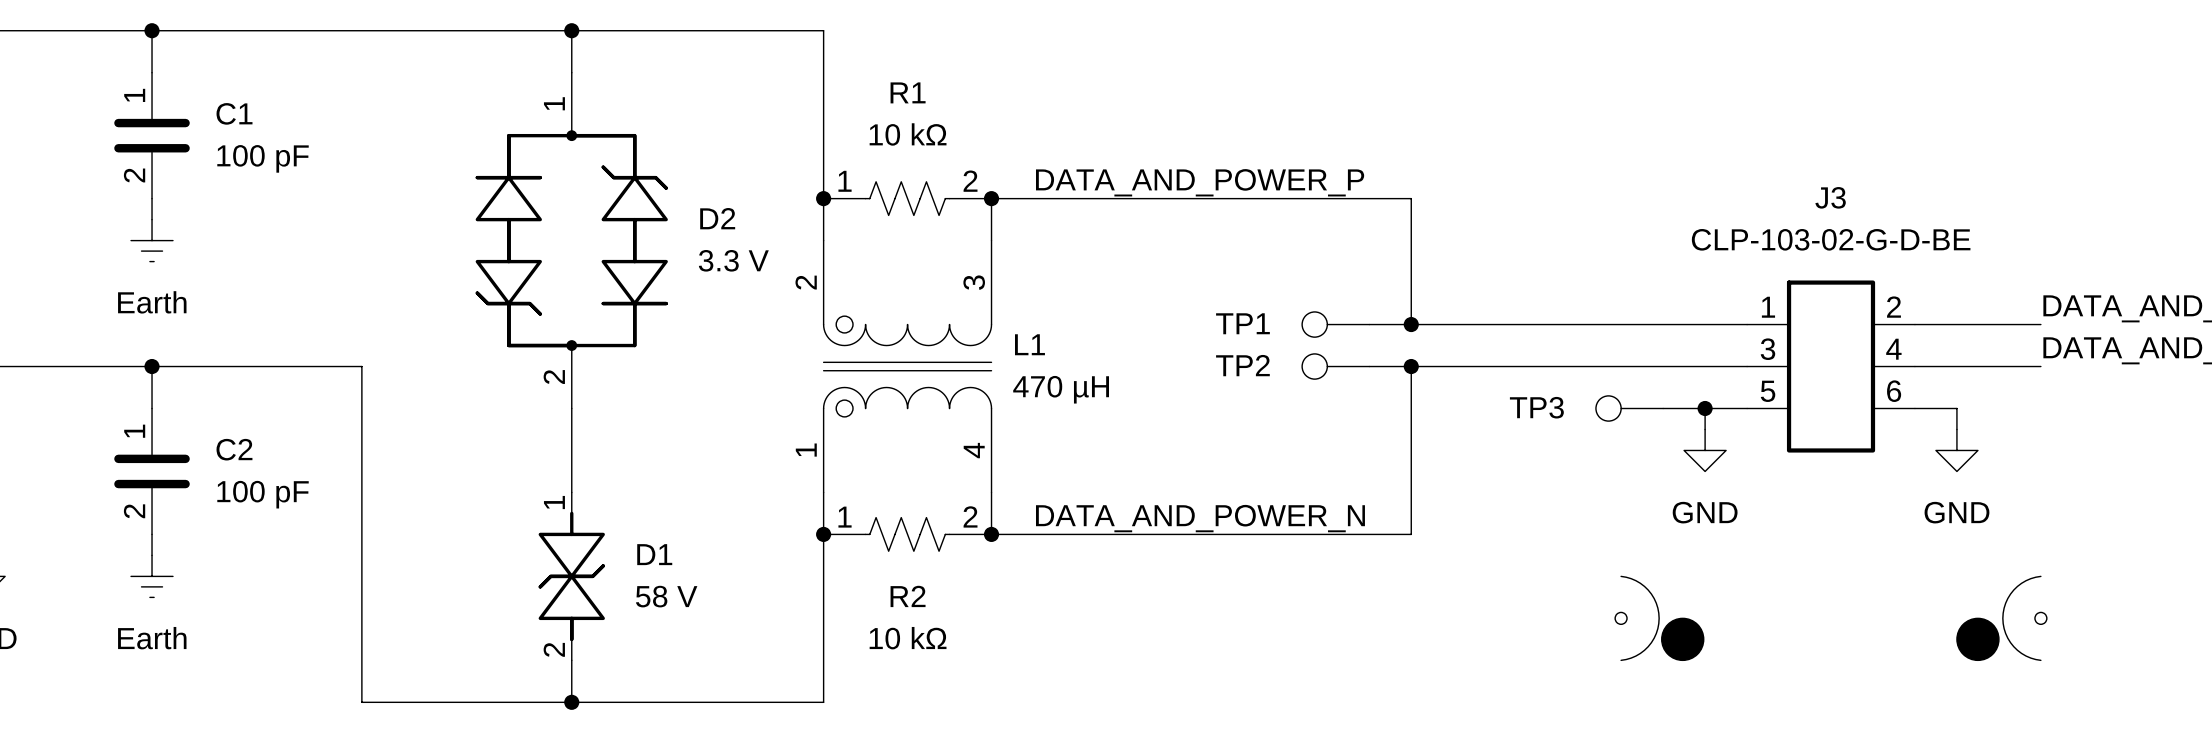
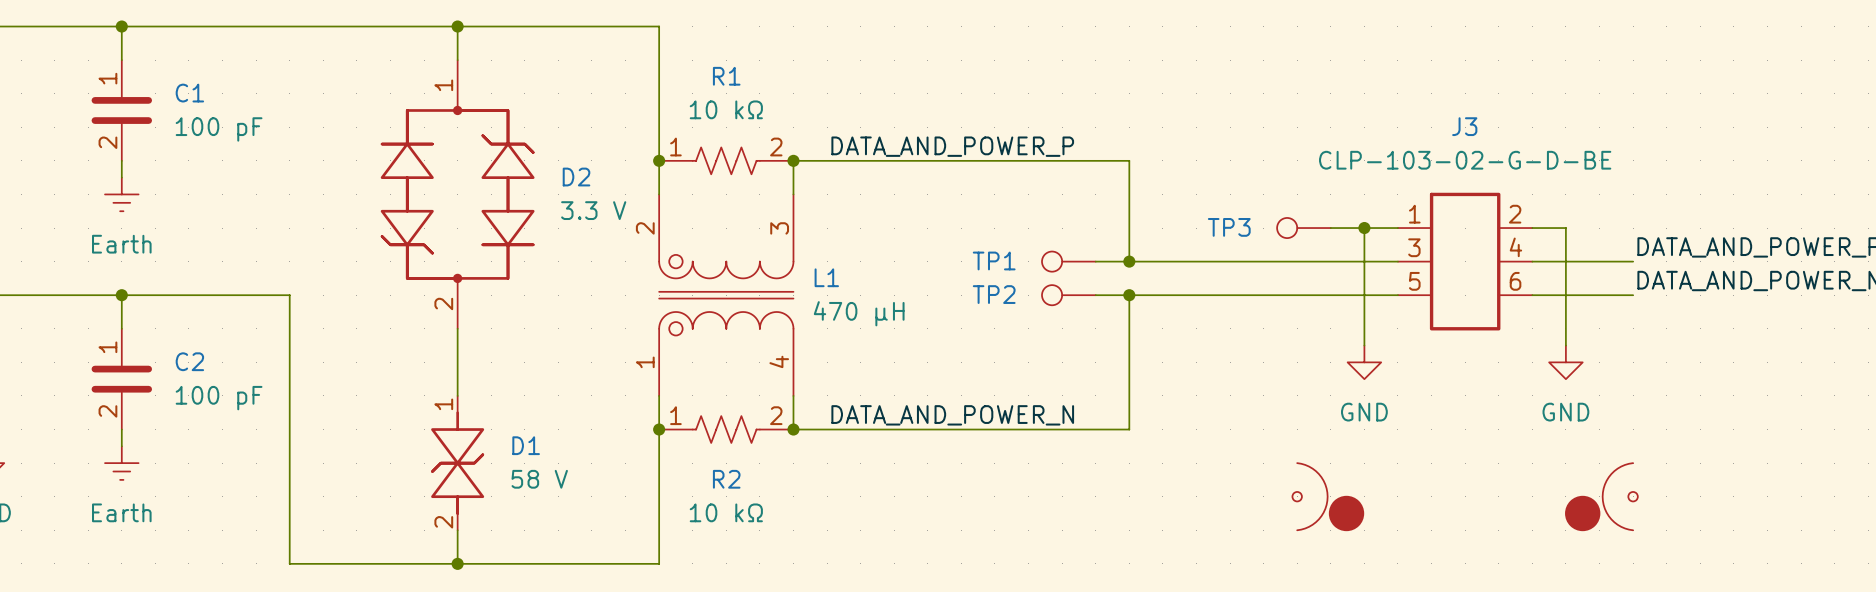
wire: none -> (1364, 228) (1364, 328)
junction: none -> (1364, 228)
J3 position: (1831, 366) -> (1465, 261)
TP3 position: (1629, 408) -> (1303, 228)
wire: (1663, 408) (1747, 408) -> (1330, 228) (1397, 228)
junction: (1705, 408) -> none
wire: (1914, 408) (1956, 408) -> (1532, 228) (1565, 228) (1565, 328)

